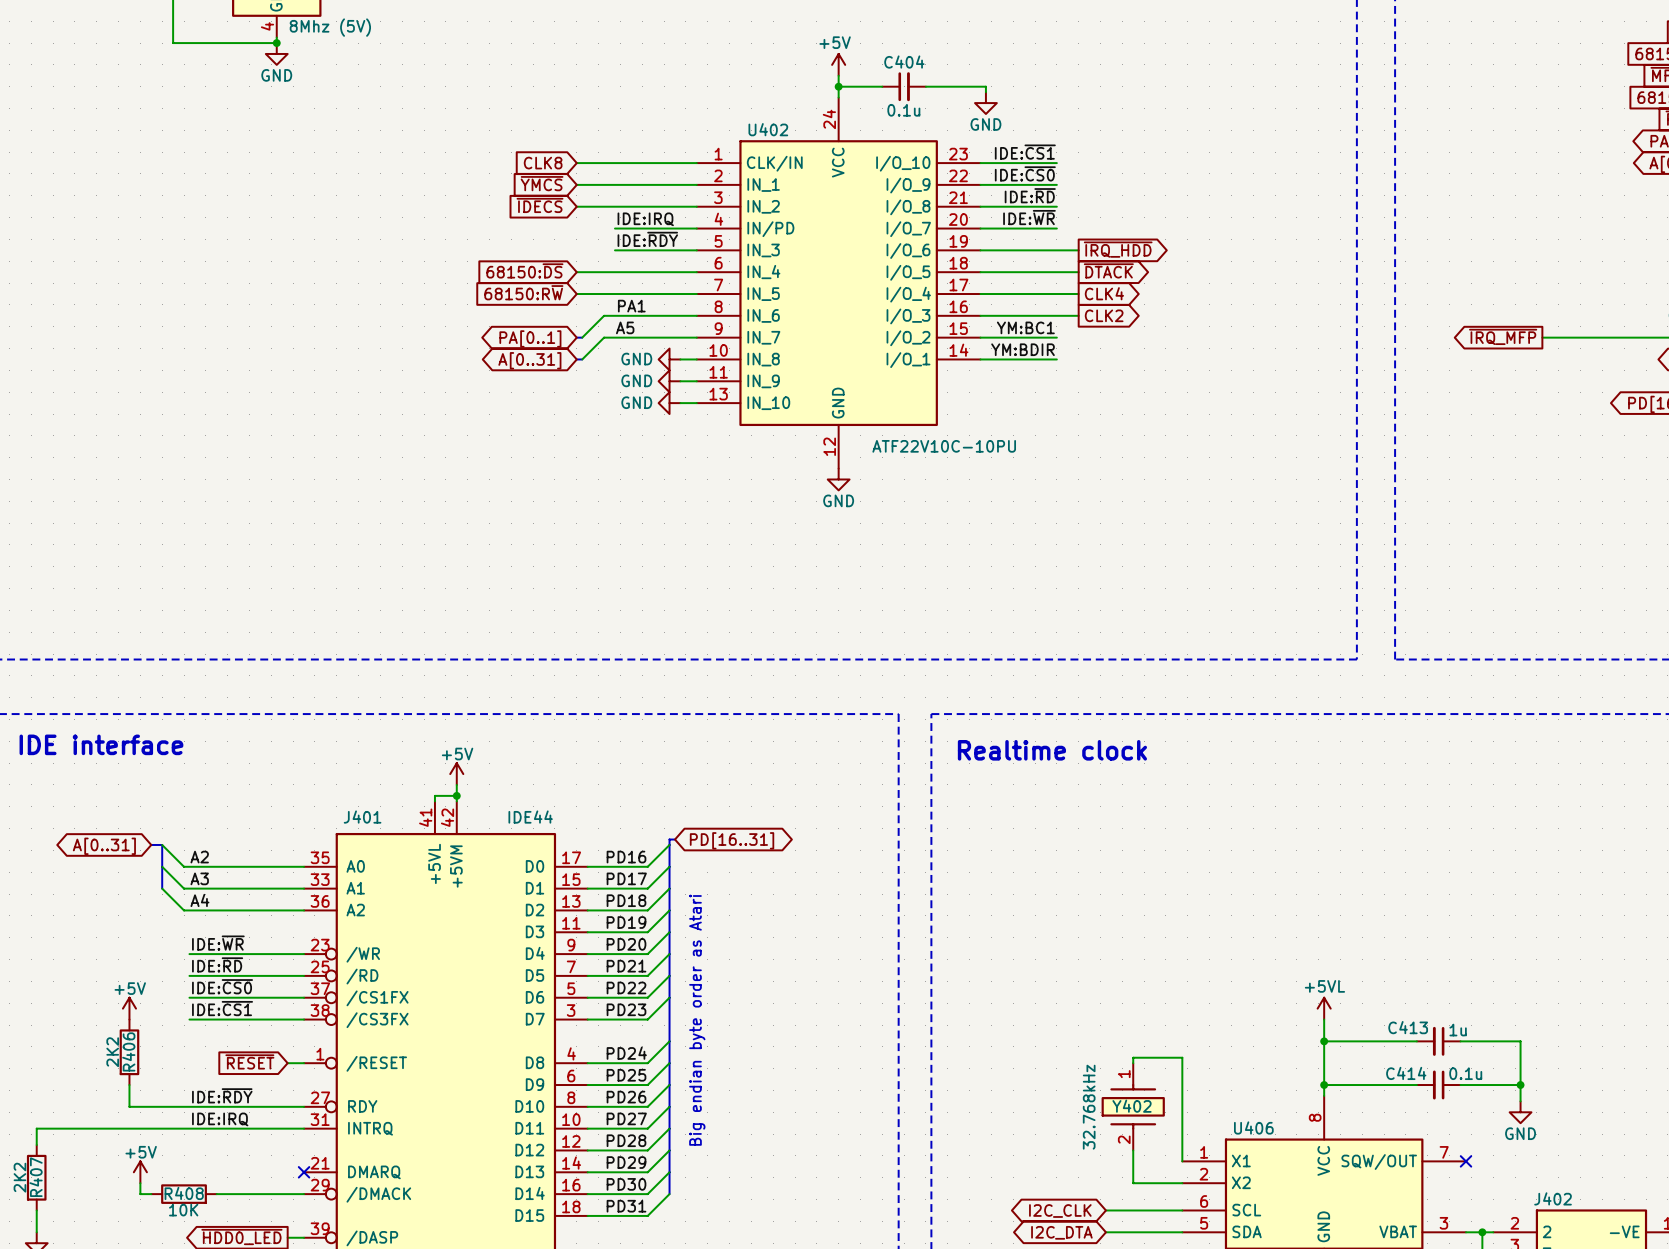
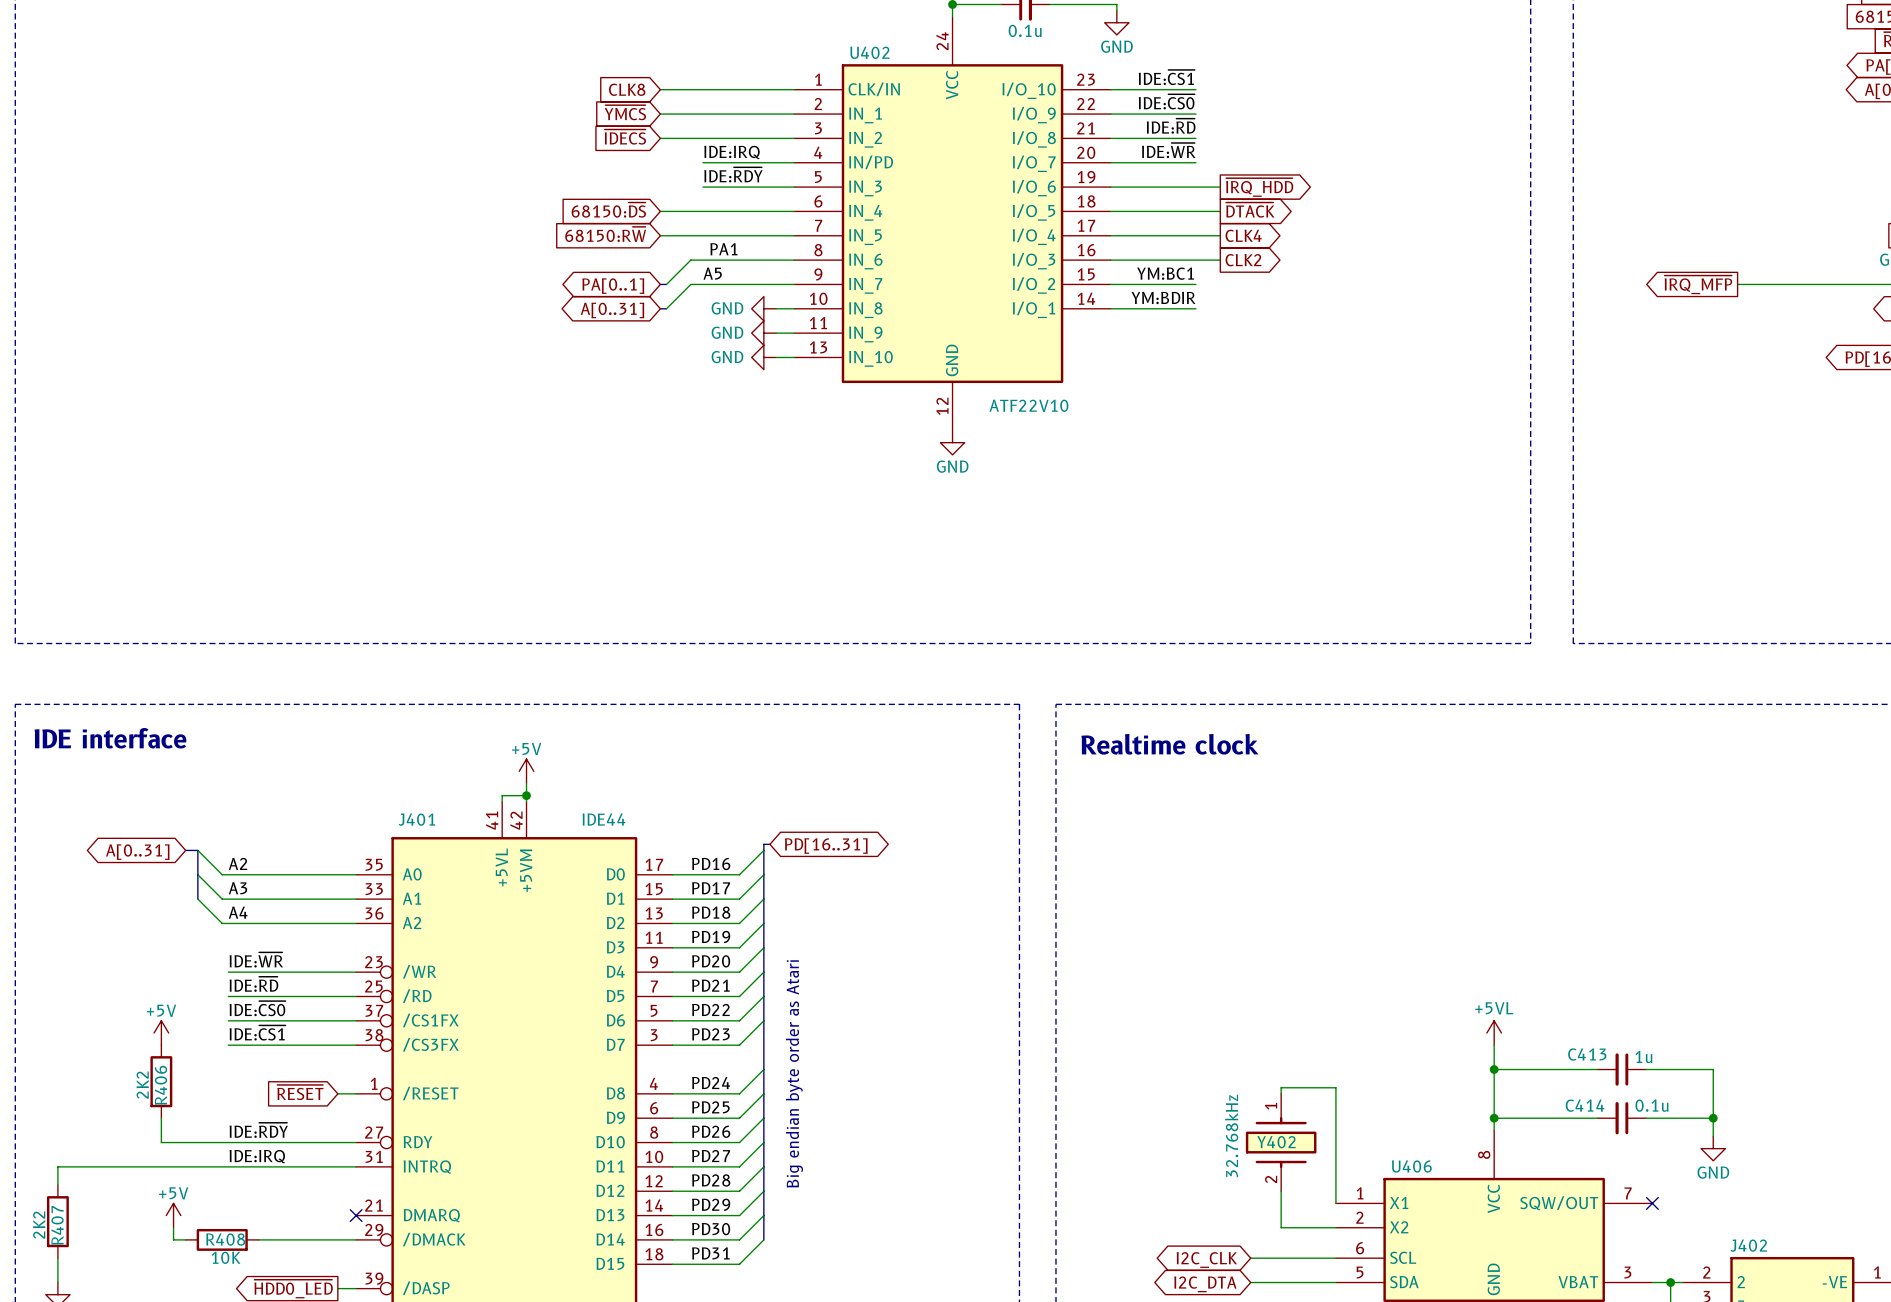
U402 value: ATF22V10C-10PU (944, 446) -> ATF22V10 (1028, 405)

